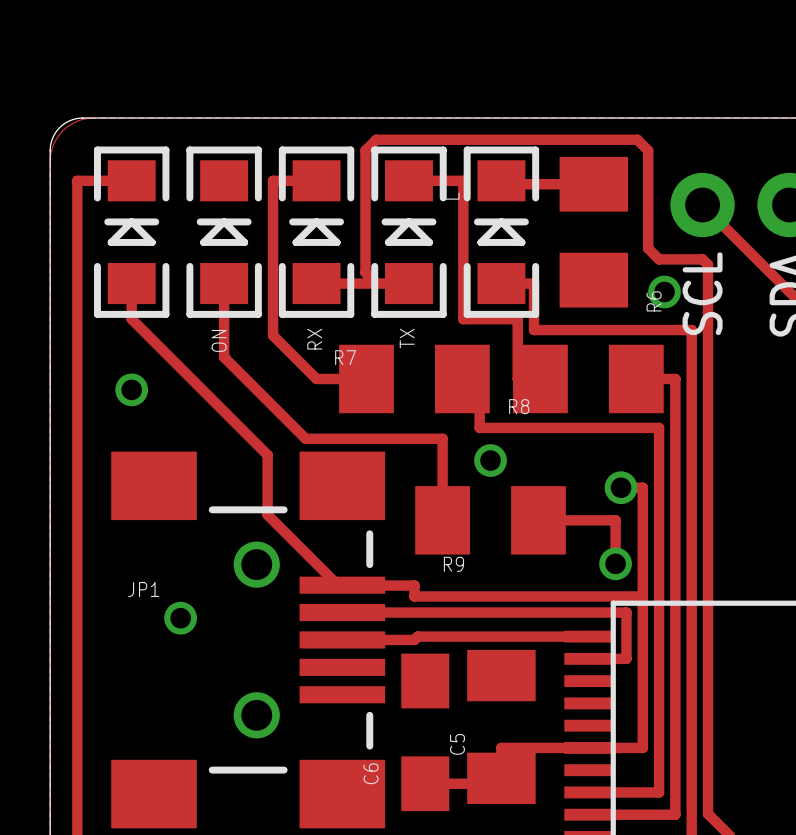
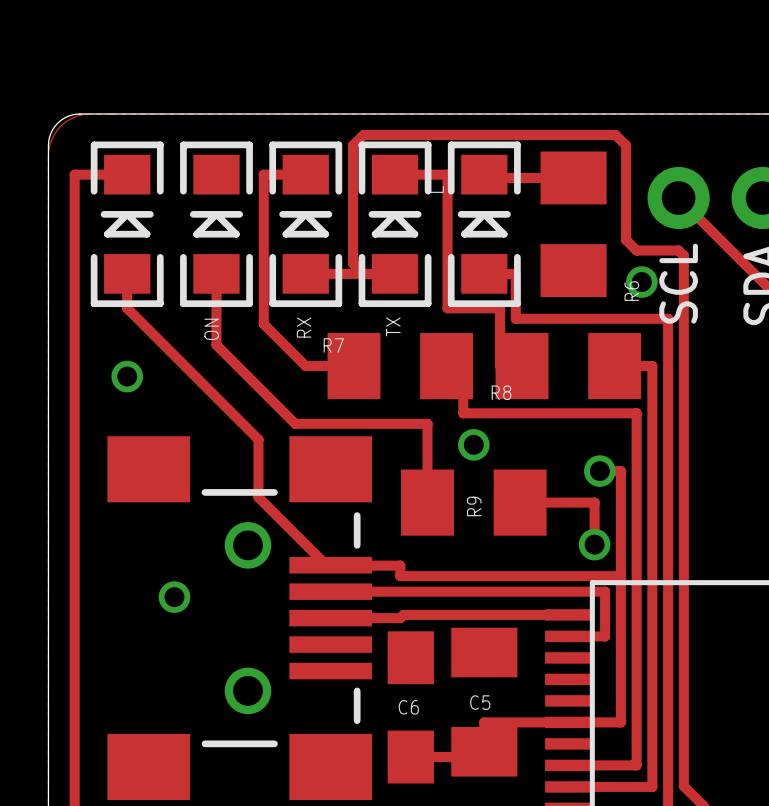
R9 name rotation: 0° (453, 564) -> 90° counterclockwise (474, 506)
R9 name position: R9 (453, 564) -> R9 (474, 506)
JP1: (248, 639) -> none
part: none -> (239, 618)
C5 name rotation: 0° (457, 744) -> 90° clockwise (480, 702)
C5 name position: C5 (457, 744) -> C5 (480, 702)
C6 name rotation: 0° (371, 773) -> 90° clockwise (408, 707)
C6 name position: C6 (371, 773) -> C6 (408, 707)

